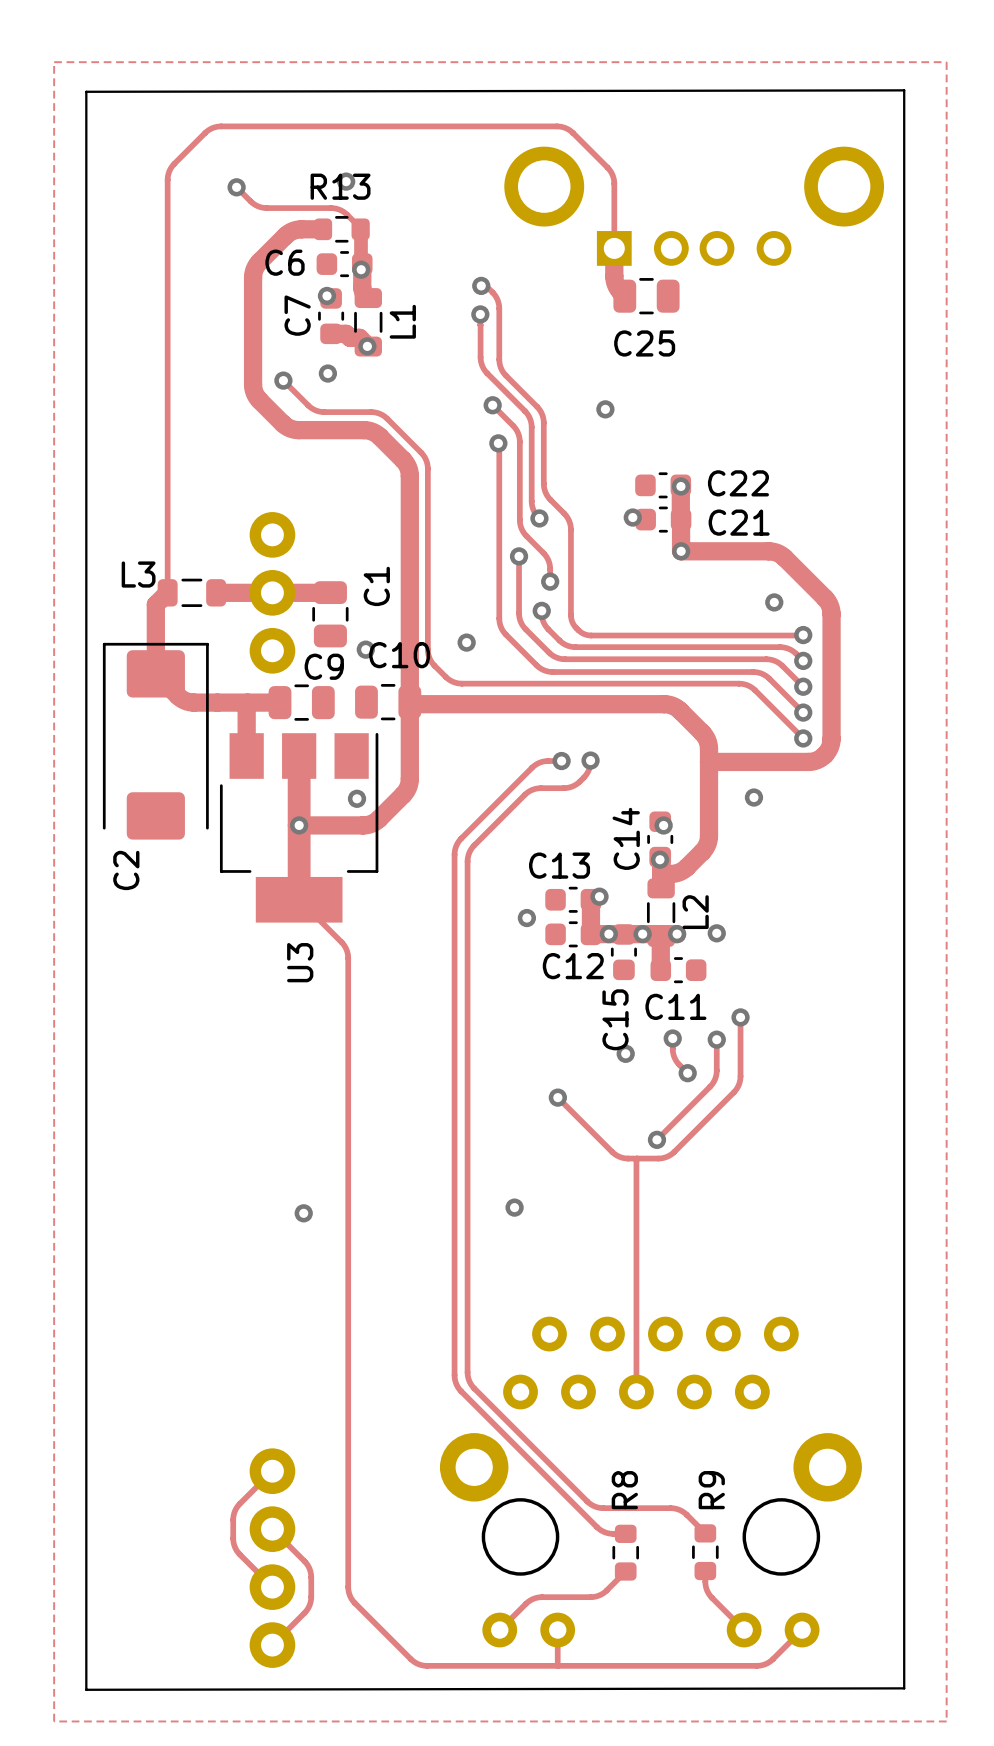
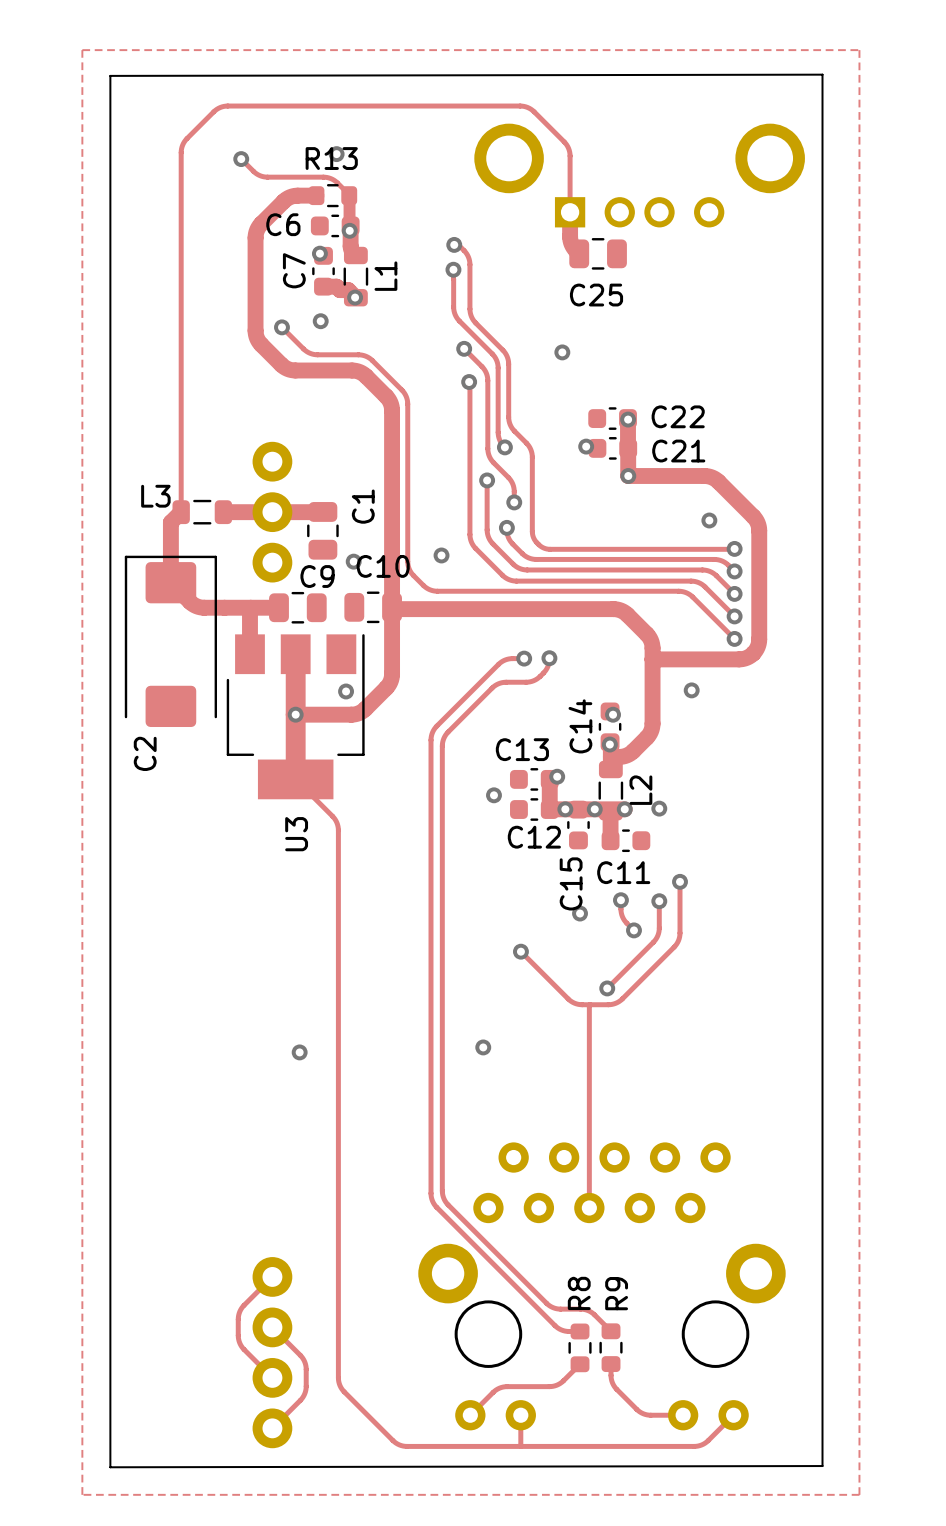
track: (626, 1508) (677, 1509) (685, 1513) (705, 1533) -> (580, 1309) (591, 1312) (611, 1331)
R9 position: (705, 1552) -> (611, 1347)
track: (705, 1571) (705, 1586) (709, 1594) (744, 1630) -> (611, 1364) (611, 1379) (614, 1386) (639, 1411) (648, 1415) (683, 1415)

